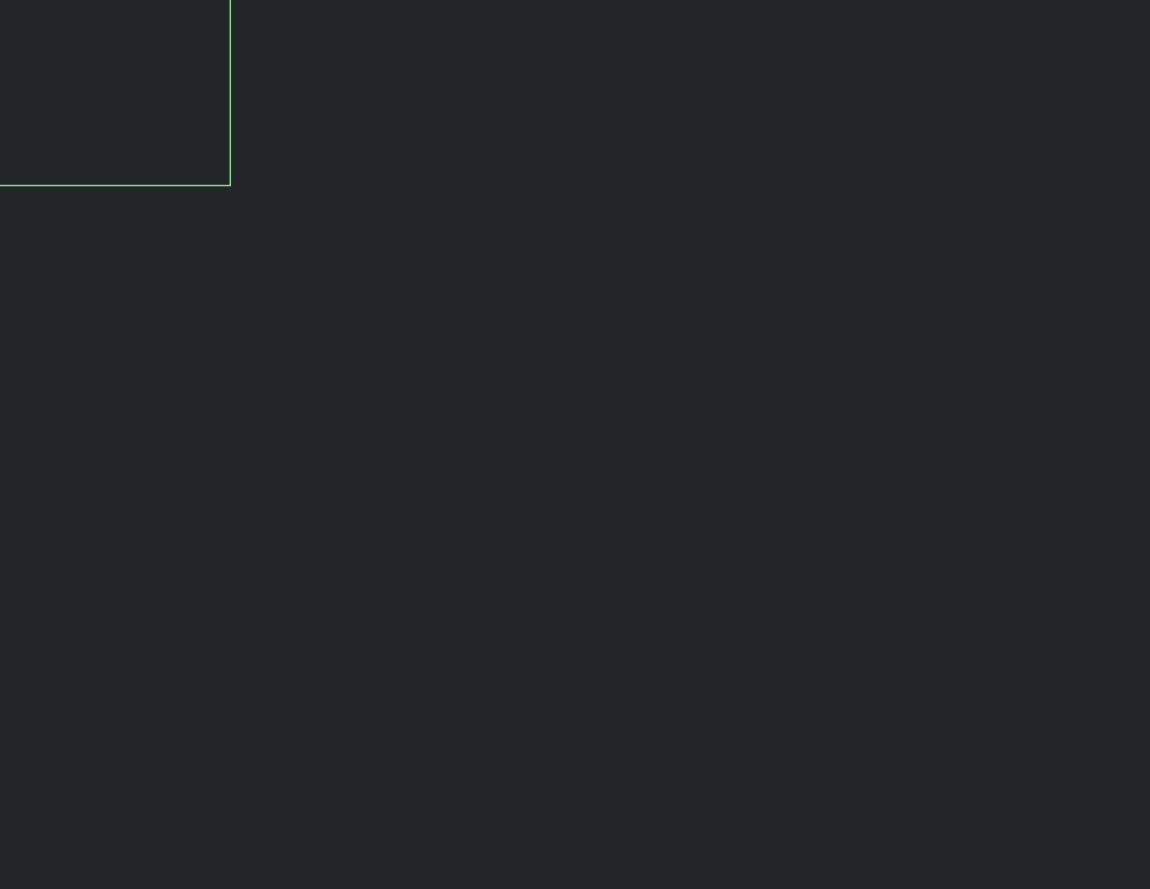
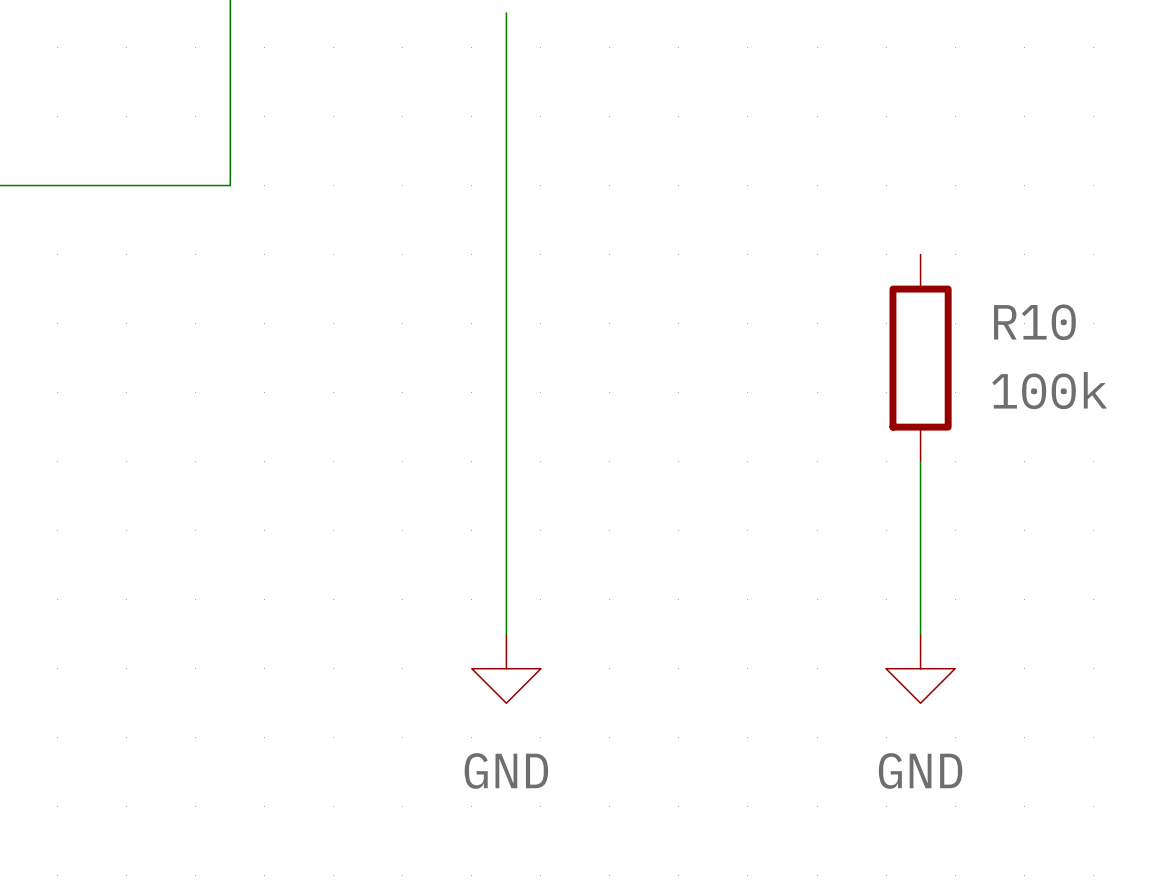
wire: none -> (506, 12) (506, 634)
R10: none -> 100k (920, 358)
wire: none -> (920, 461) (920, 634)
power symbol: none -> GND (506, 668)
power symbol: none -> GND (920, 668)

